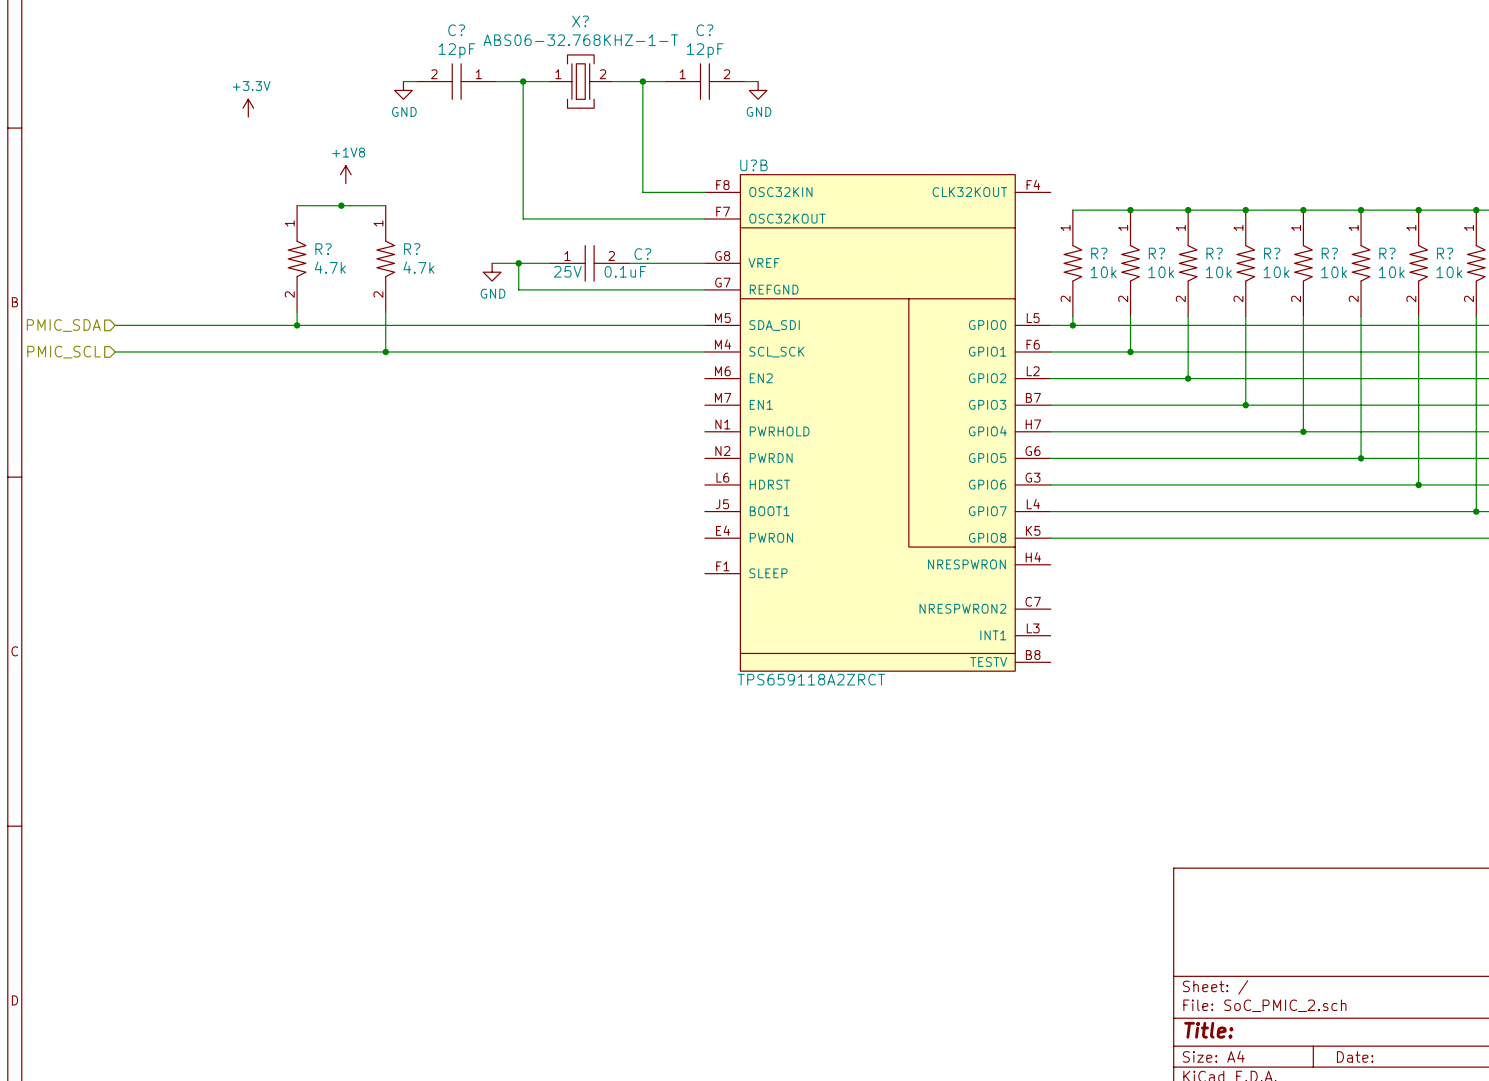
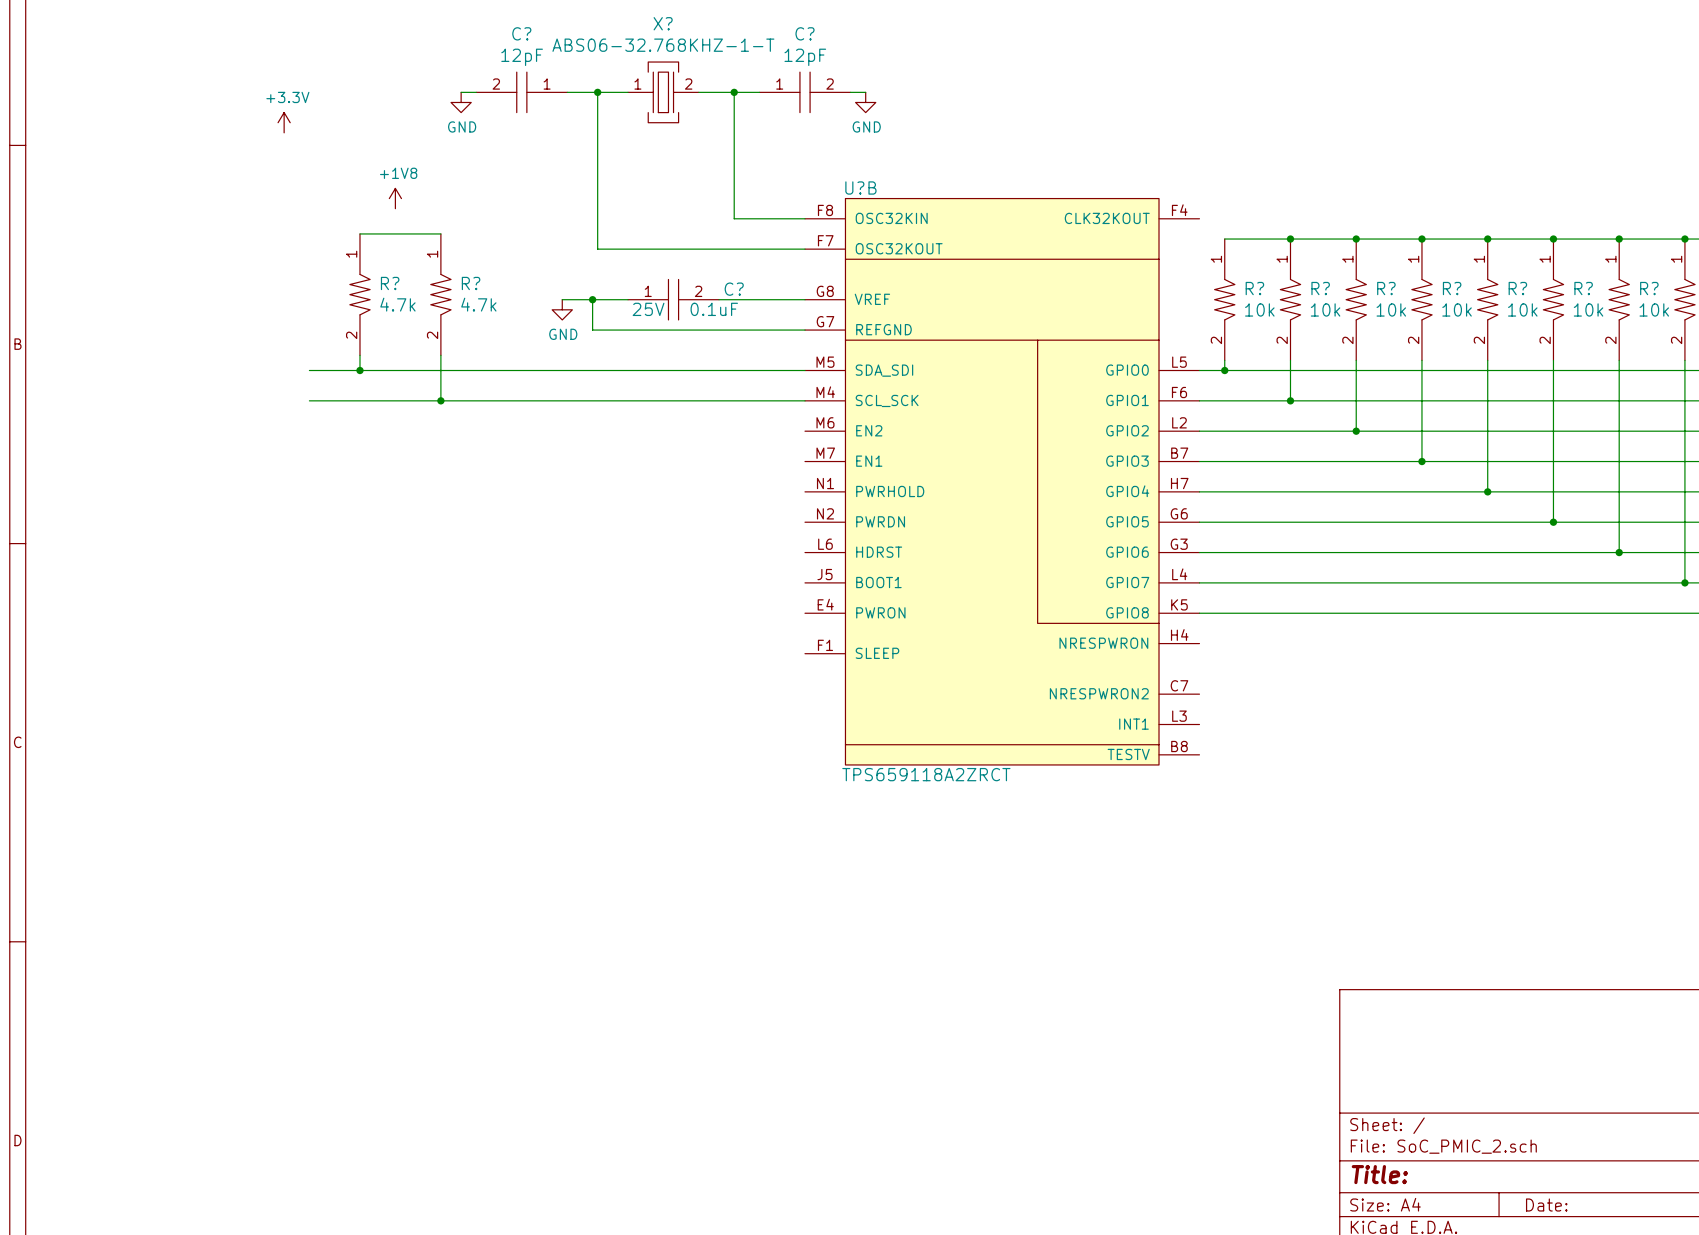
wire: (297, 205) (314, 205) -> none
junction: (341, 205) -> none
R? position: (297, 258) -> (359, 294)
wire: (297, 312) (297, 325) -> (359, 355) (359, 370)
hierarchical label: PMIC_SDA (63, 325) -> none
wire: (115, 325) (270, 325) -> none
junction position: (297, 325) -> (359, 370)
wire: (115, 351) (270, 351) -> none
hierarchical label: PMIC_SCL (64, 352) -> none

